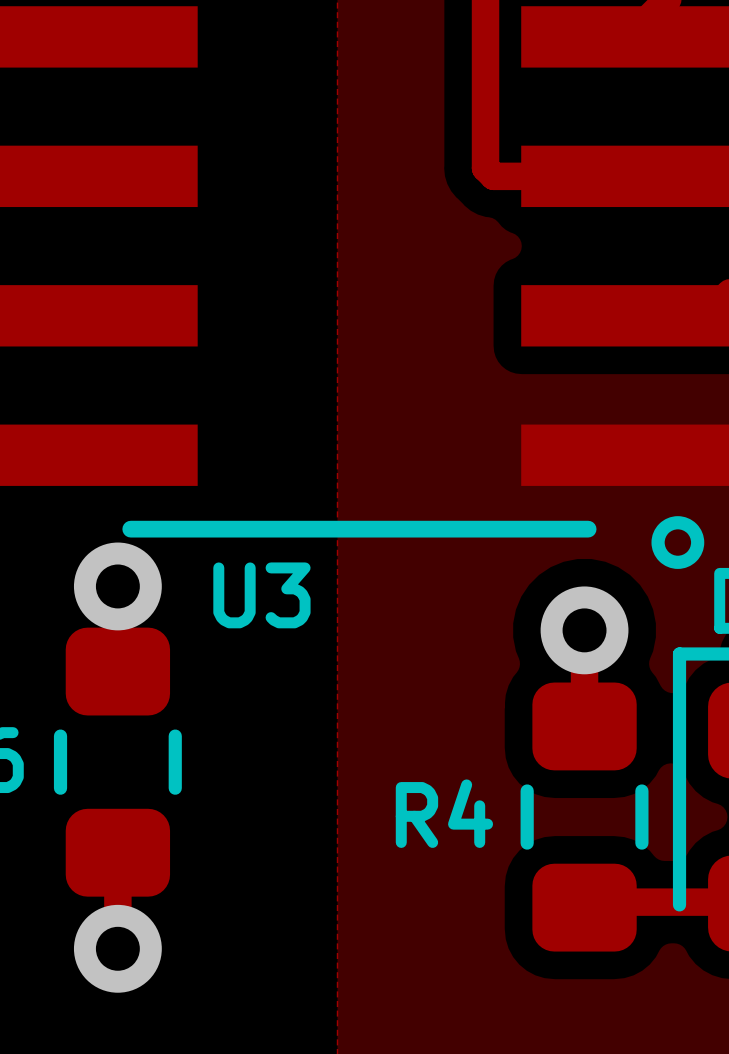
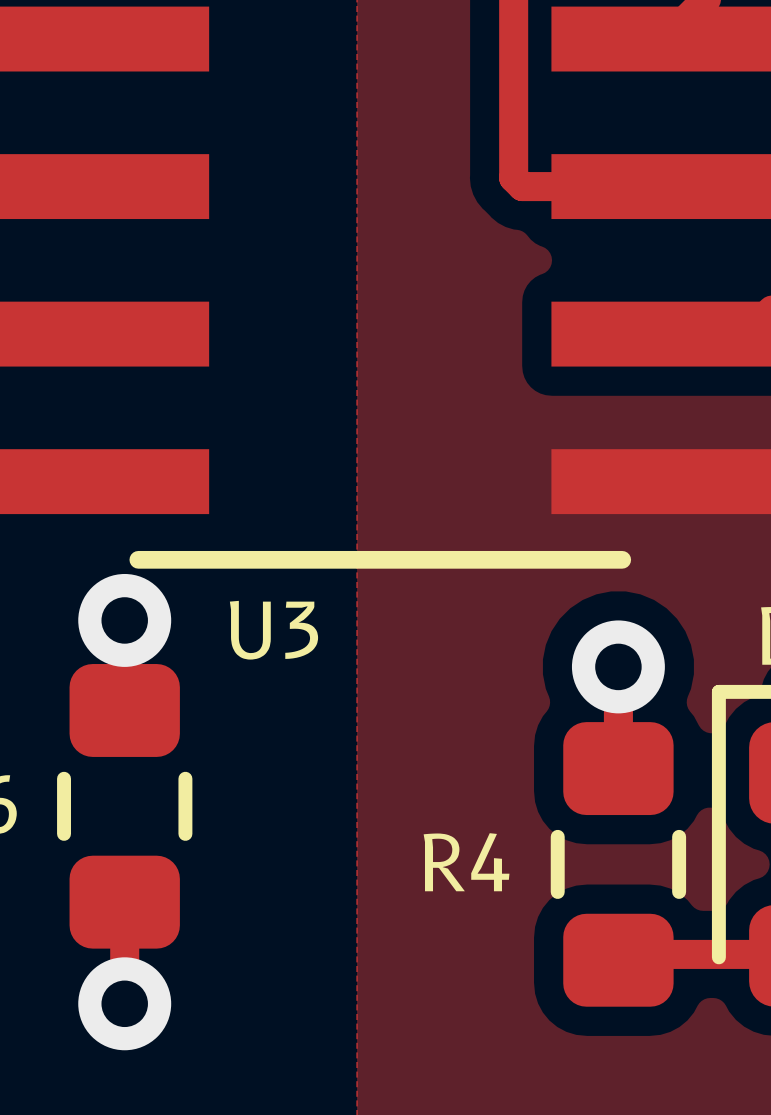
drawing: [651, 516, 705, 569] -> none

